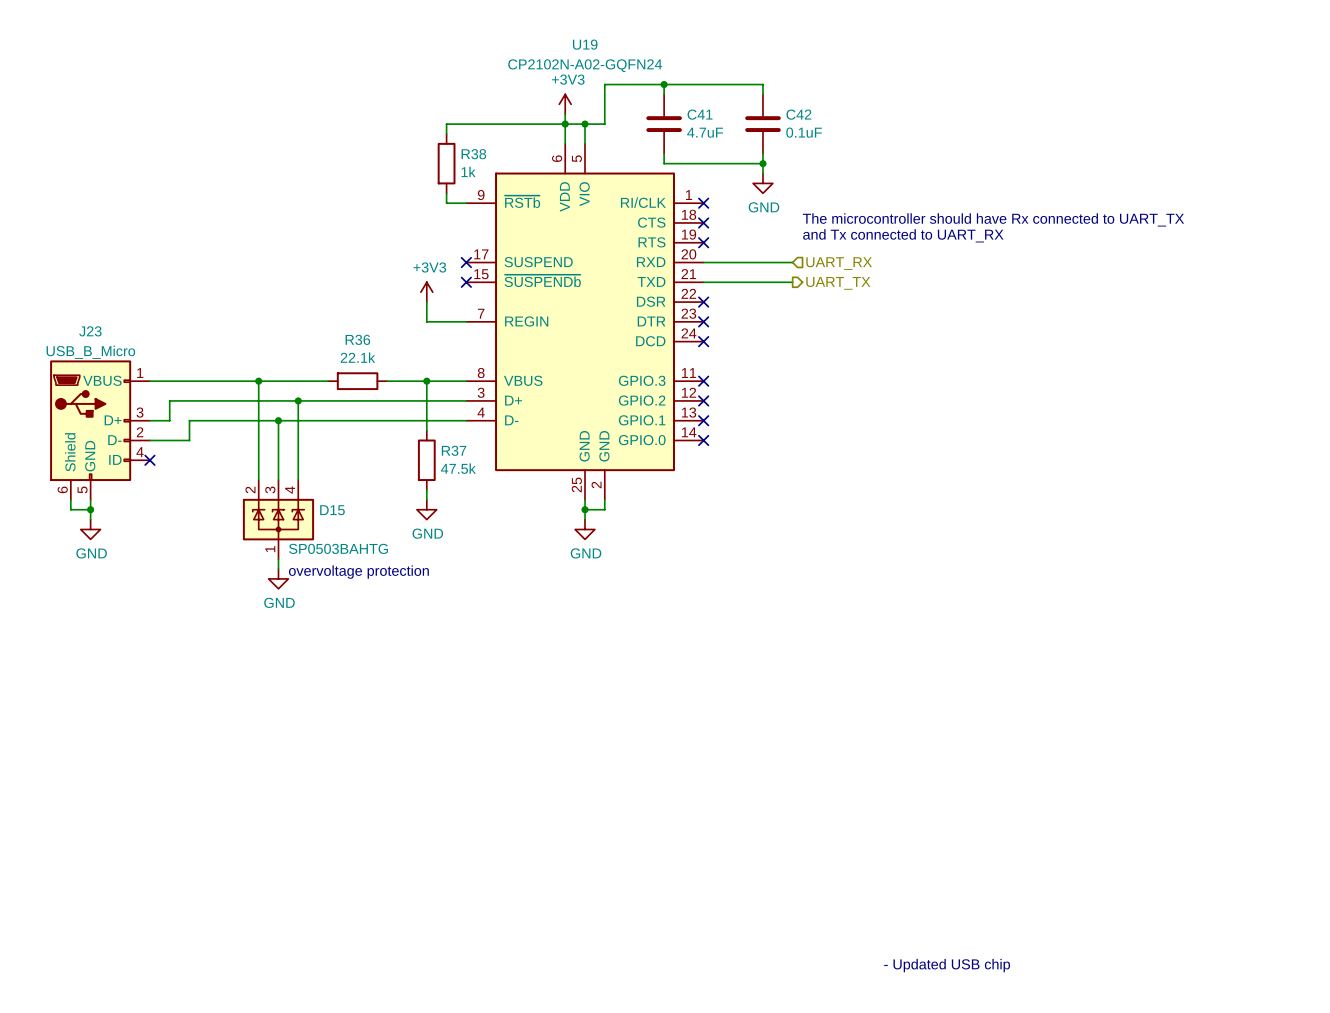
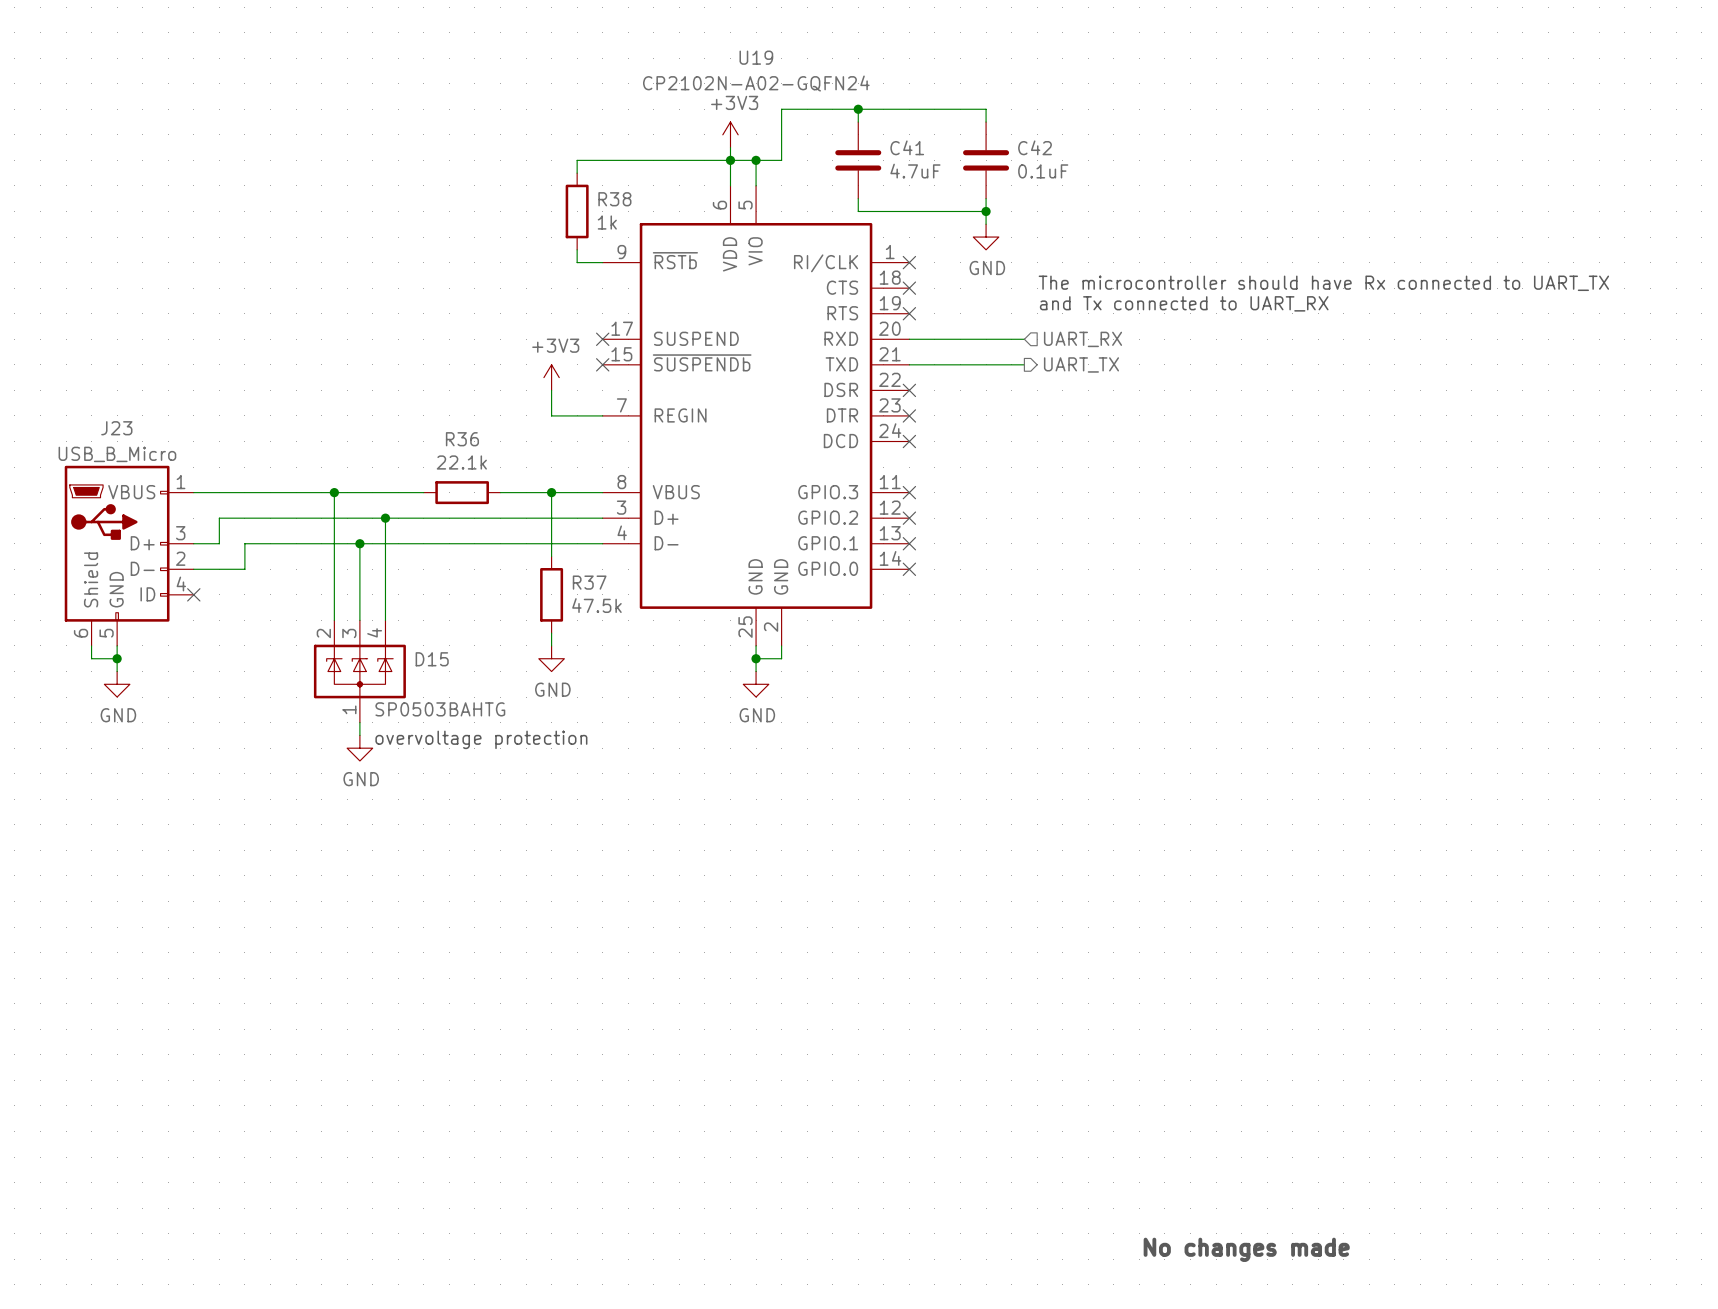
text: - Updated USB chip (947, 965) -> No changes made (1246, 1249)

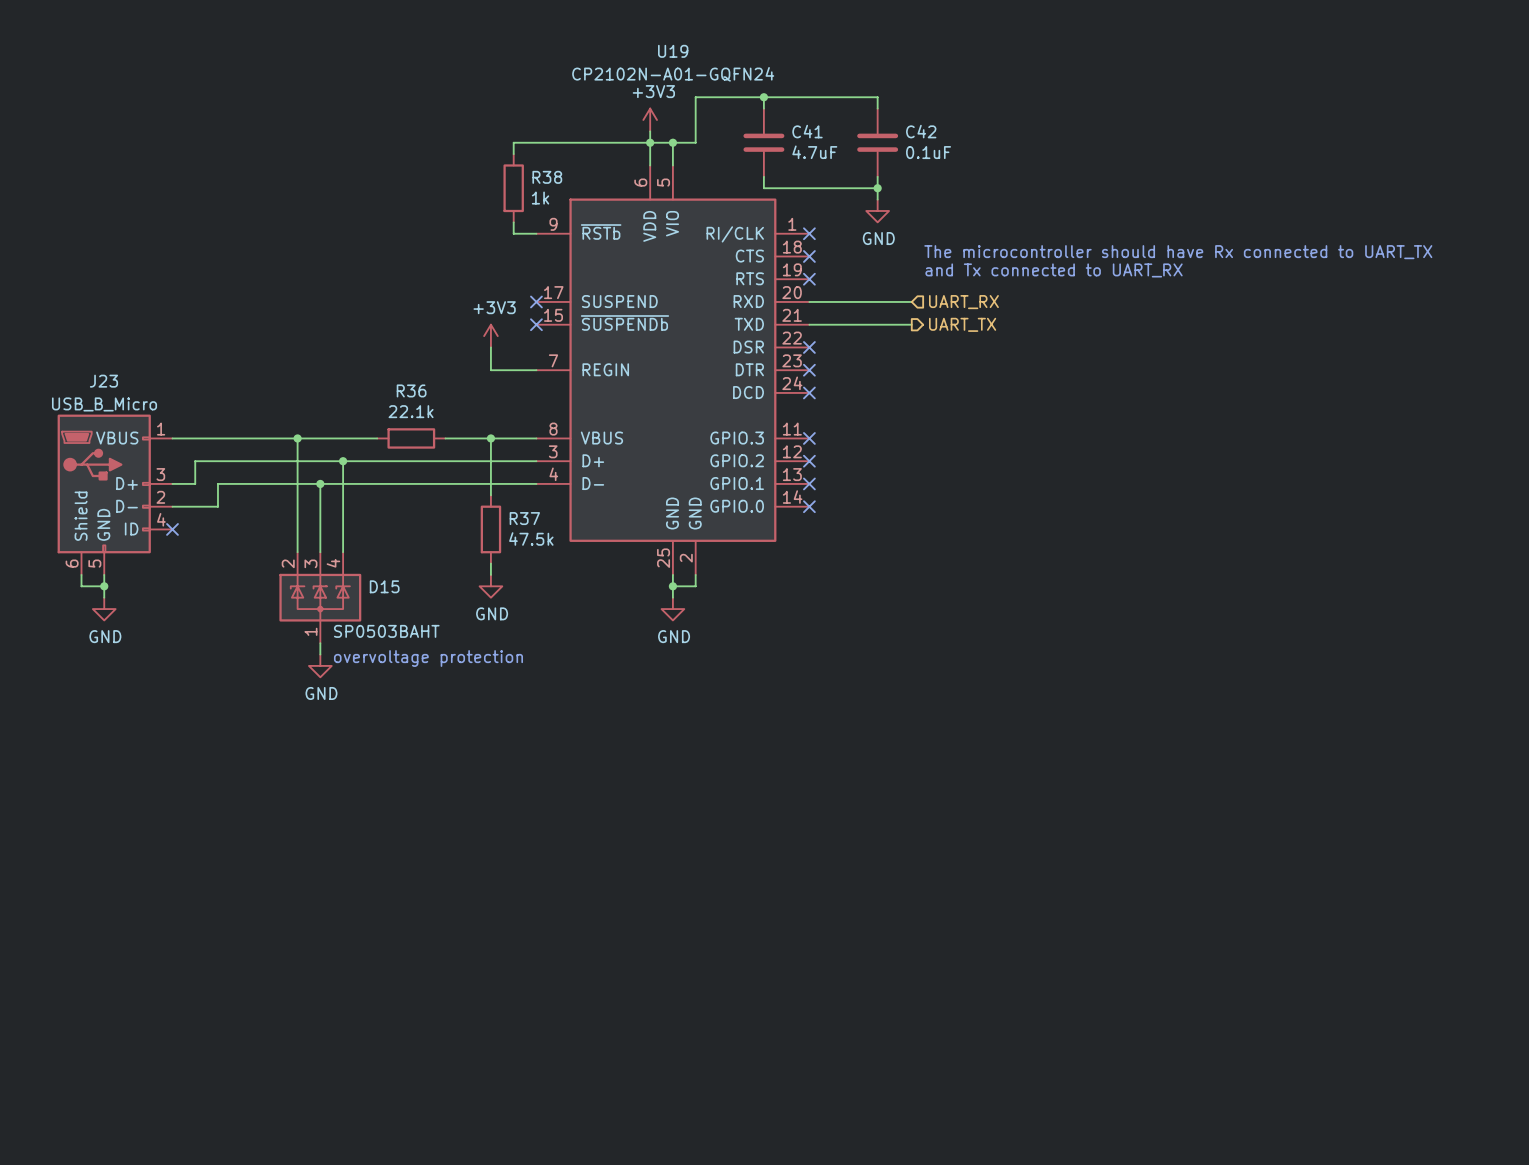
U19 value: CP2102N-A02-GQFN24 (756, 83) -> CP2102N-A01-GQFN24 (673, 74)
D15 value: SP0503BAHTG (440, 709) -> SP0503BAHT (386, 631)
text: No changes made (1246, 1249) -> none

